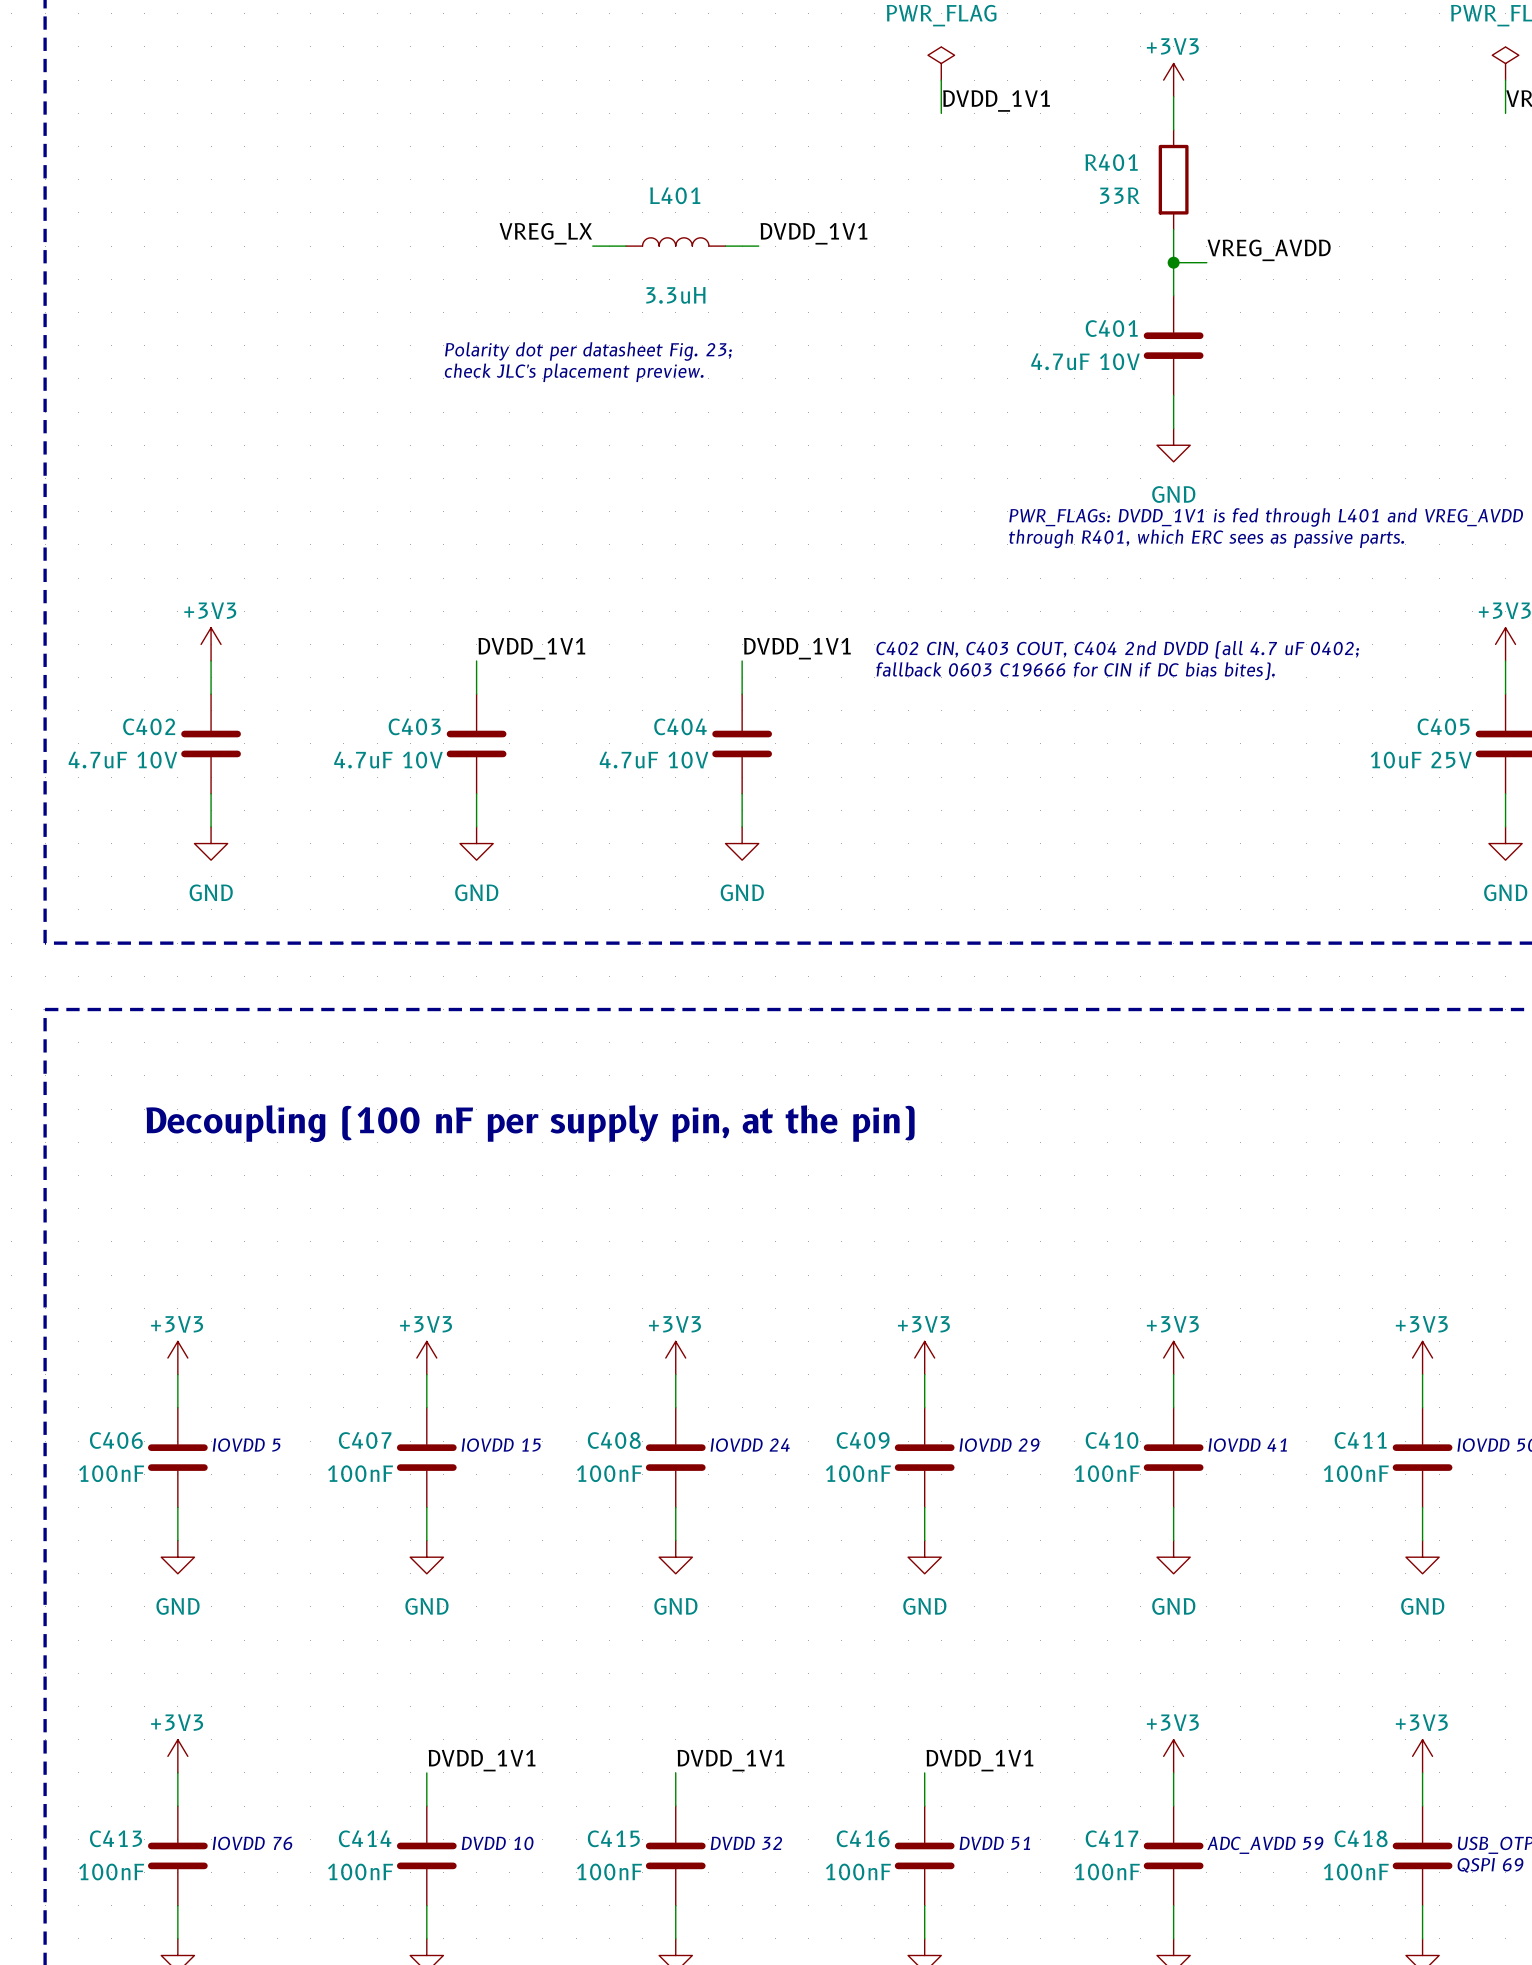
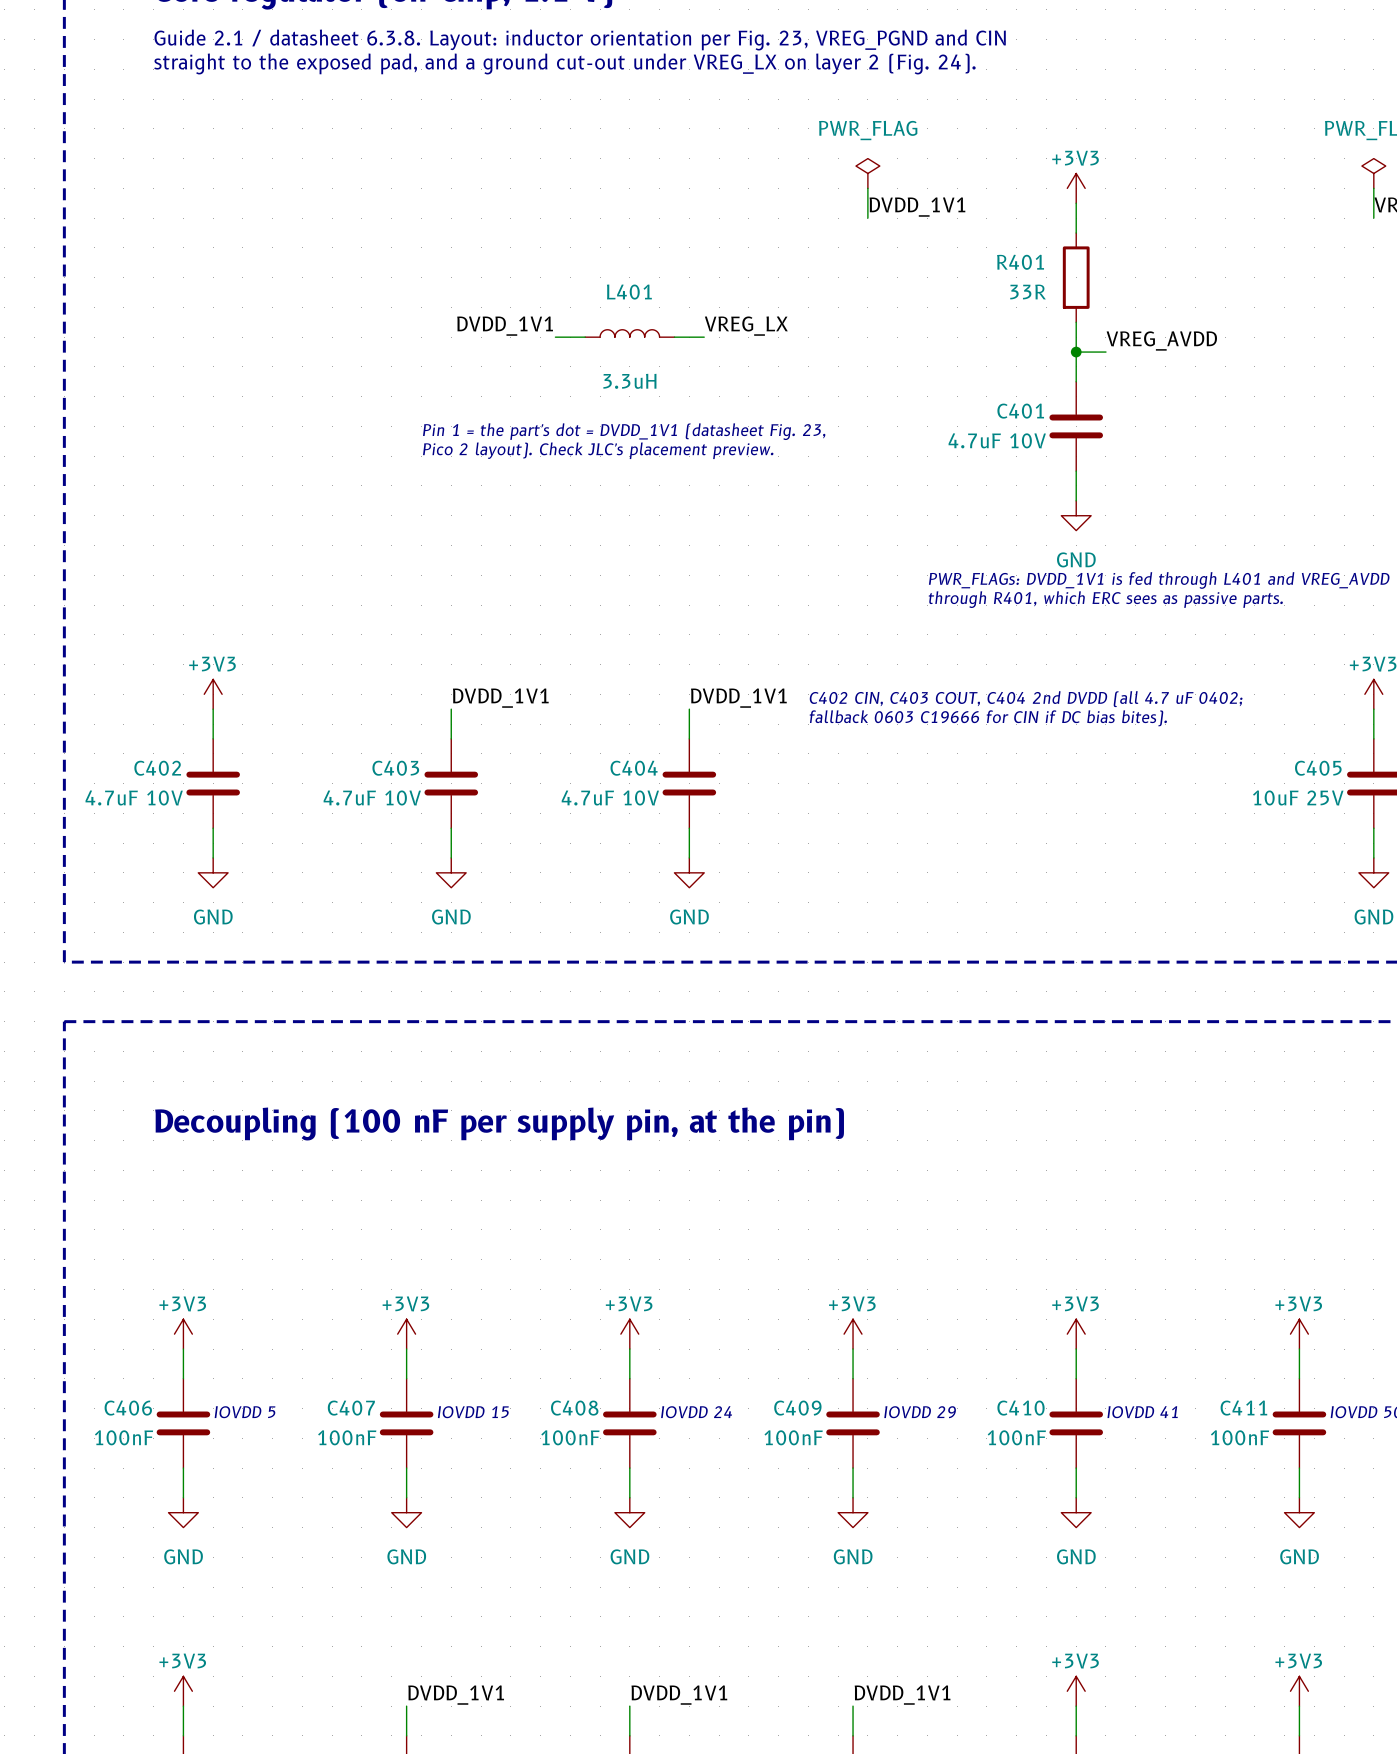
label: VREG_LX (545, 233) -> DVDD_1V1 (505, 326)
label: DVDD_1V1 (813, 233) -> VREG_LX (746, 326)
text: Polarity dot per datasheet Fig. 23; (588, 351) -> Pin 1 = the part's dot = DVDD_1V1 (datasheet Fig. 23, (624, 431)
text: check JLC's placement preview. (574, 372) -> Pico 2 layout). Check JLC's placement preview. (598, 450)

